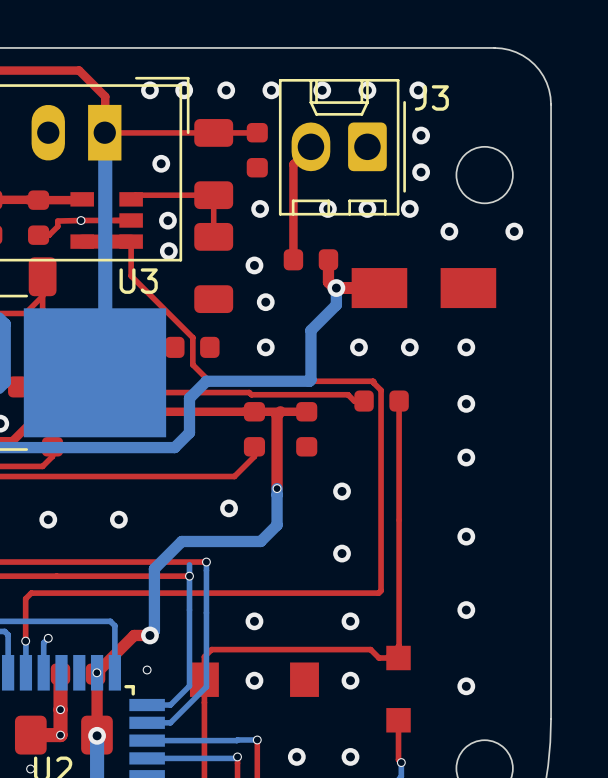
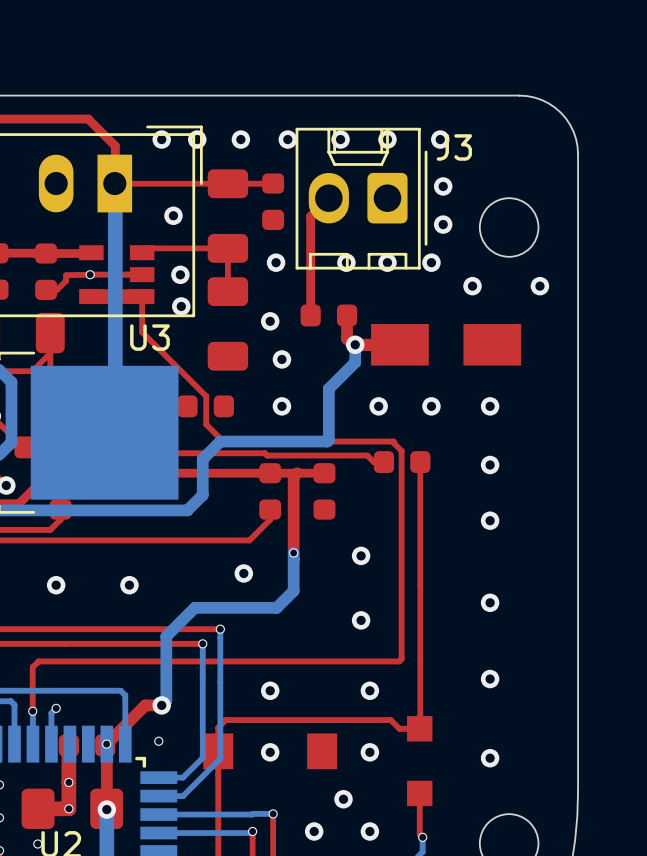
bottom track: (189, 564) (189, 576) -> none
via: none -> (343, 799)

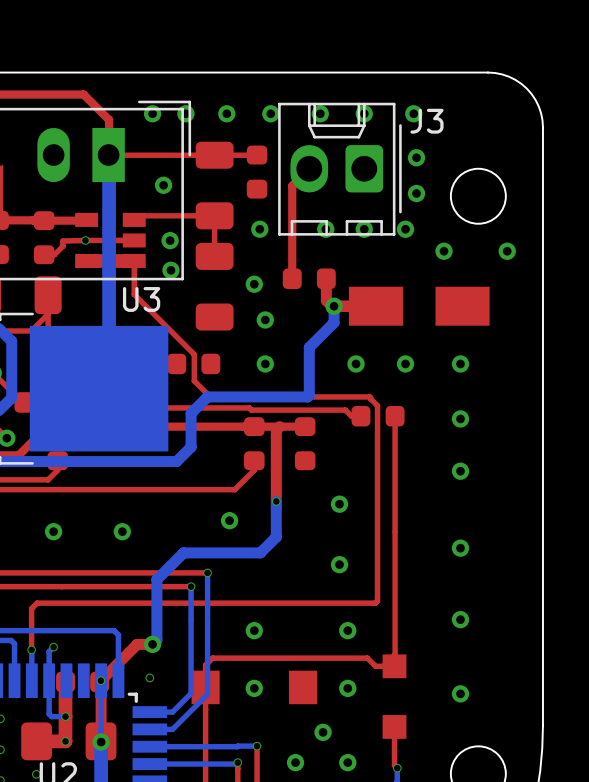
bottom track: none -> (49, 680) (49, 714) (51, 716) (65, 716)
bottom track: none -> (101, 680) (101, 742)

